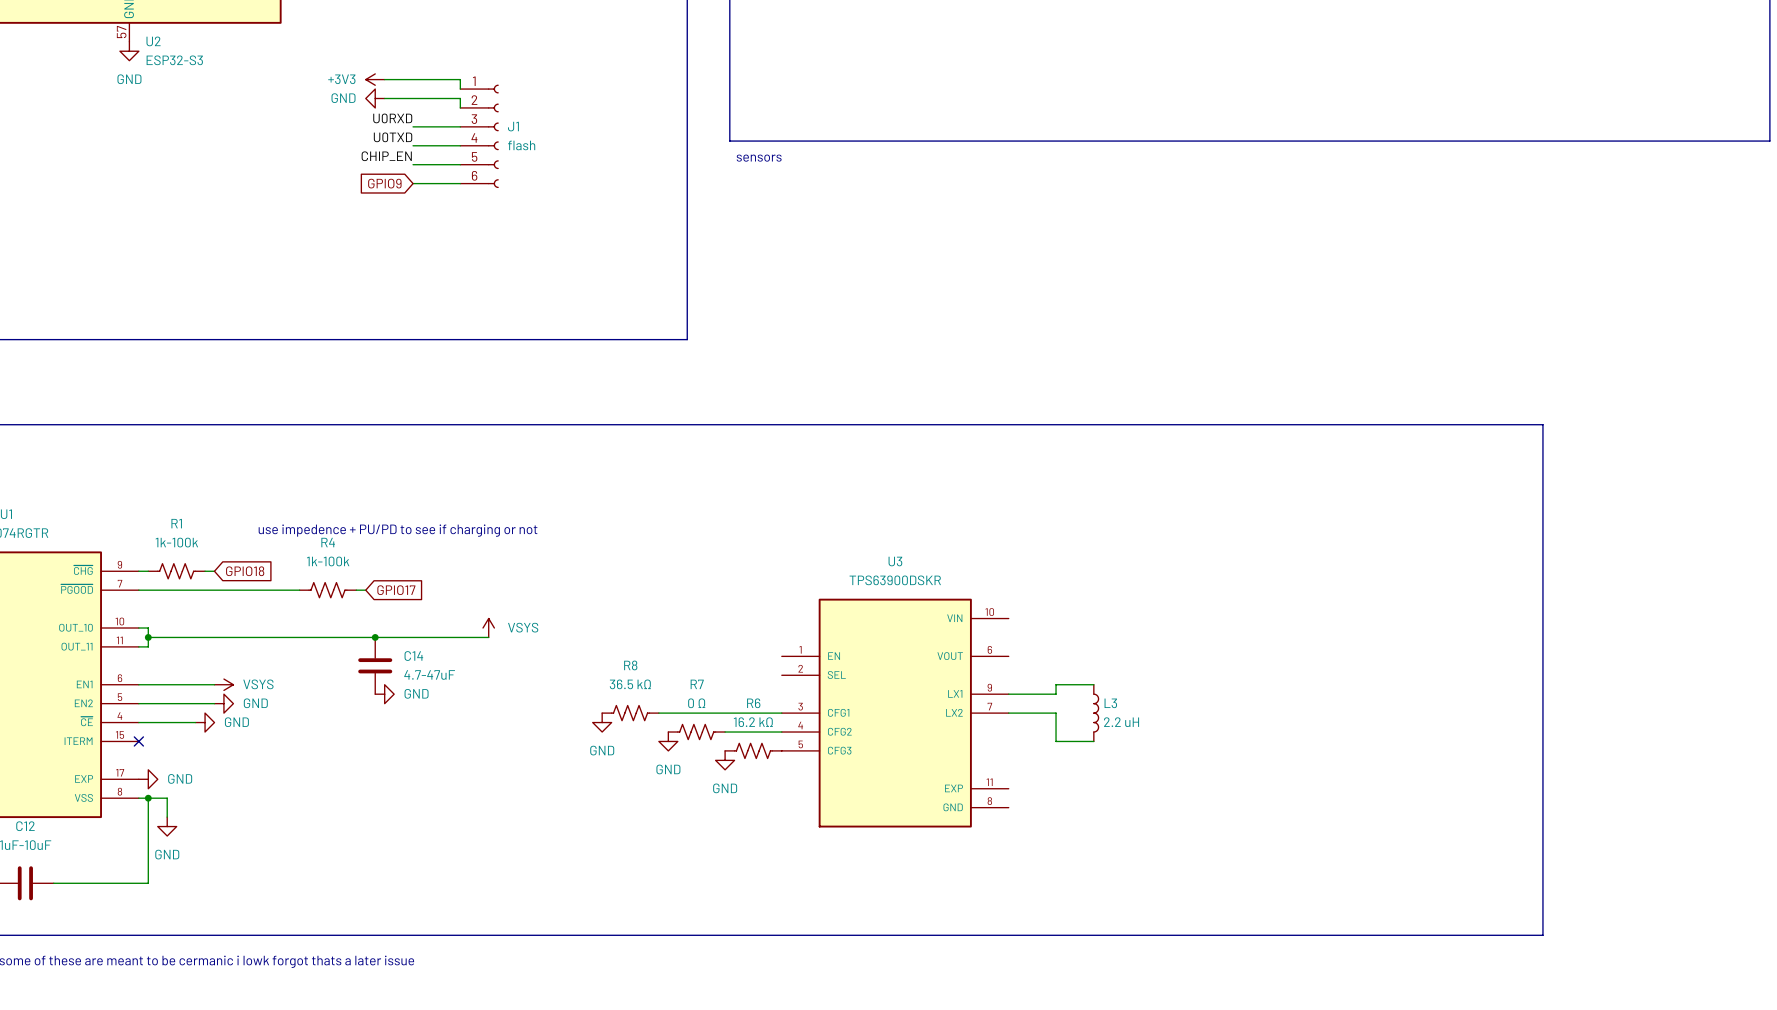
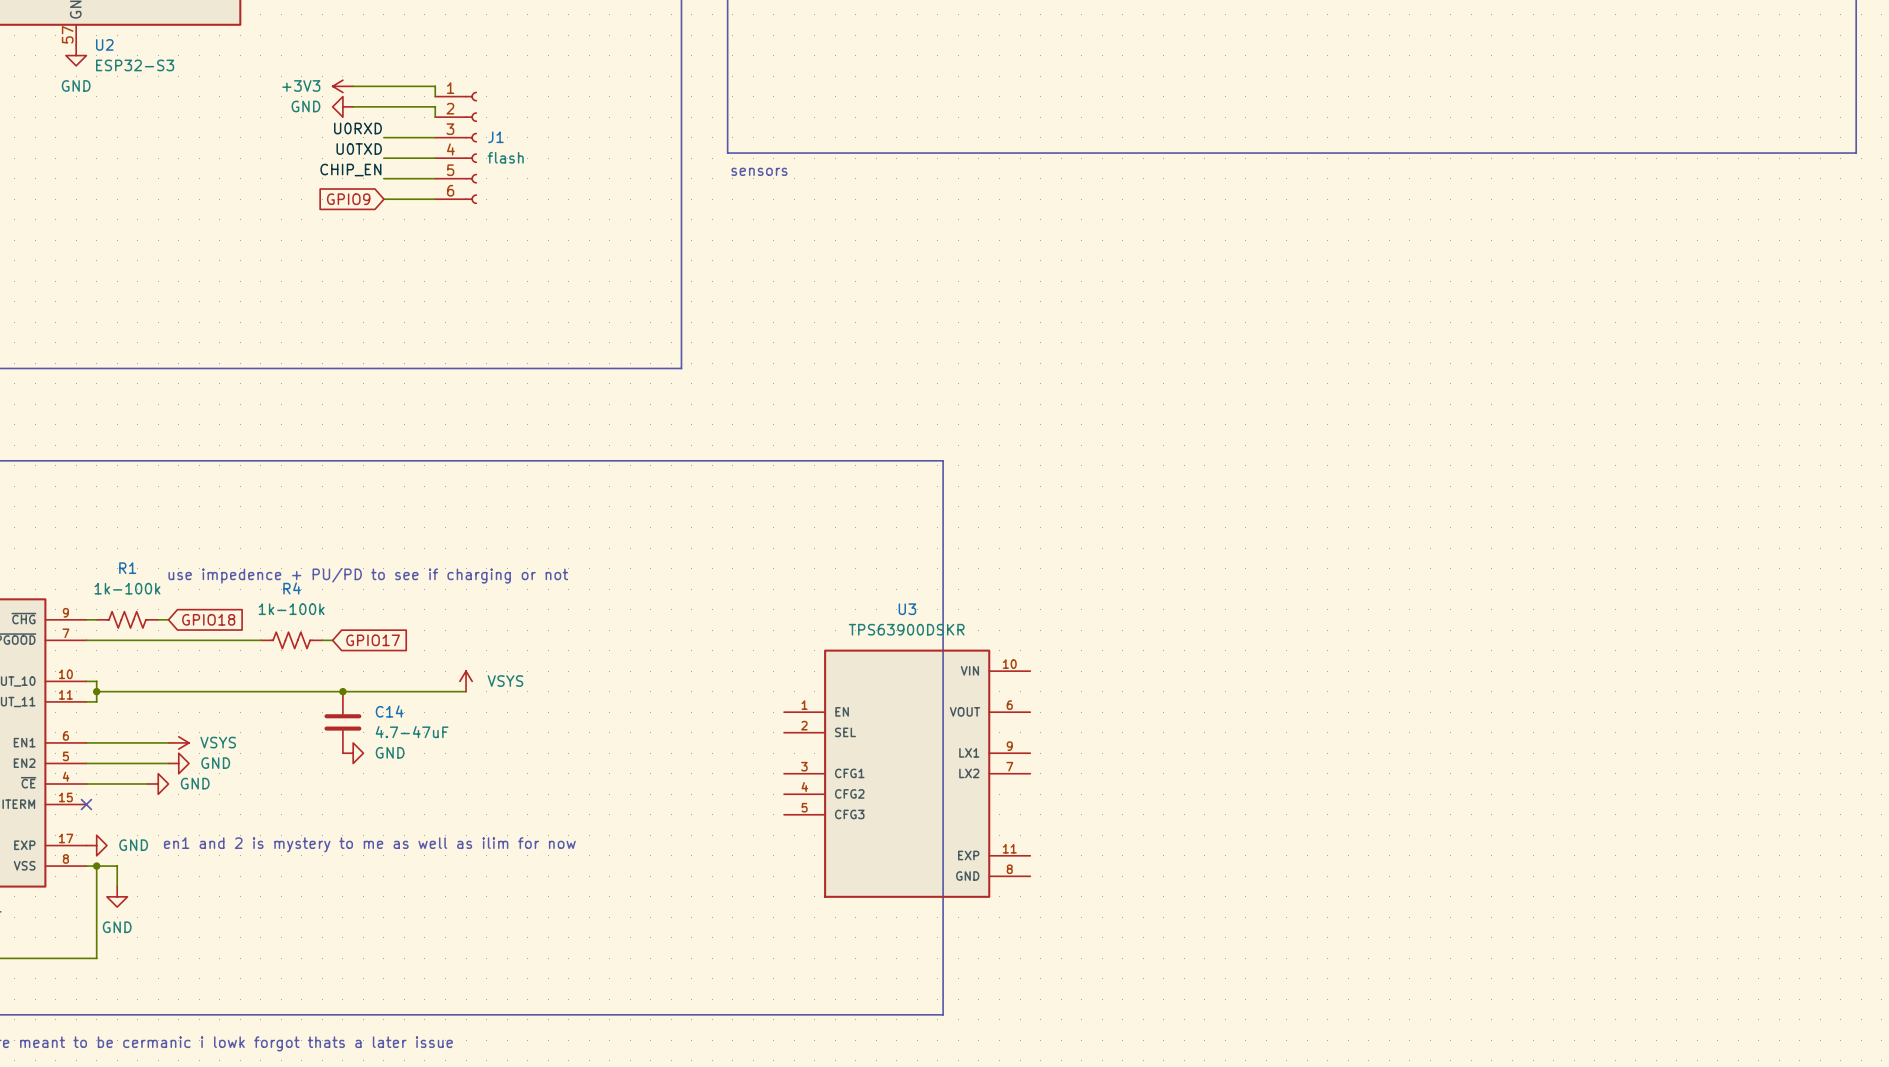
line: (928, 424) (1542, 424) (1542, 935) (928, 935) -> (943, 460) (943, 1014)
wire: (1093, 684) (1056, 684) (1056, 694) (1008, 694) -> none
R8: 36.5 kΩ (630, 713) -> none
wire: (658, 713) (781, 713) -> none
wire: (1008, 713) (1056, 713) (1056, 741) (1093, 741) -> none
L3: 2.2 uH (1096, 713) -> none
power symbol: GND (602, 722) -> none
R7: 0 Ω (696, 732) -> none
wire: (725, 732) (781, 732) -> none
power symbol: GND (668, 741) -> none
R6: 16.2 kΩ (753, 750) -> none
power symbol: GND (725, 760) -> none
text: none -> en1 and 2 is mystery to me as well as ilim for now (369, 844)

